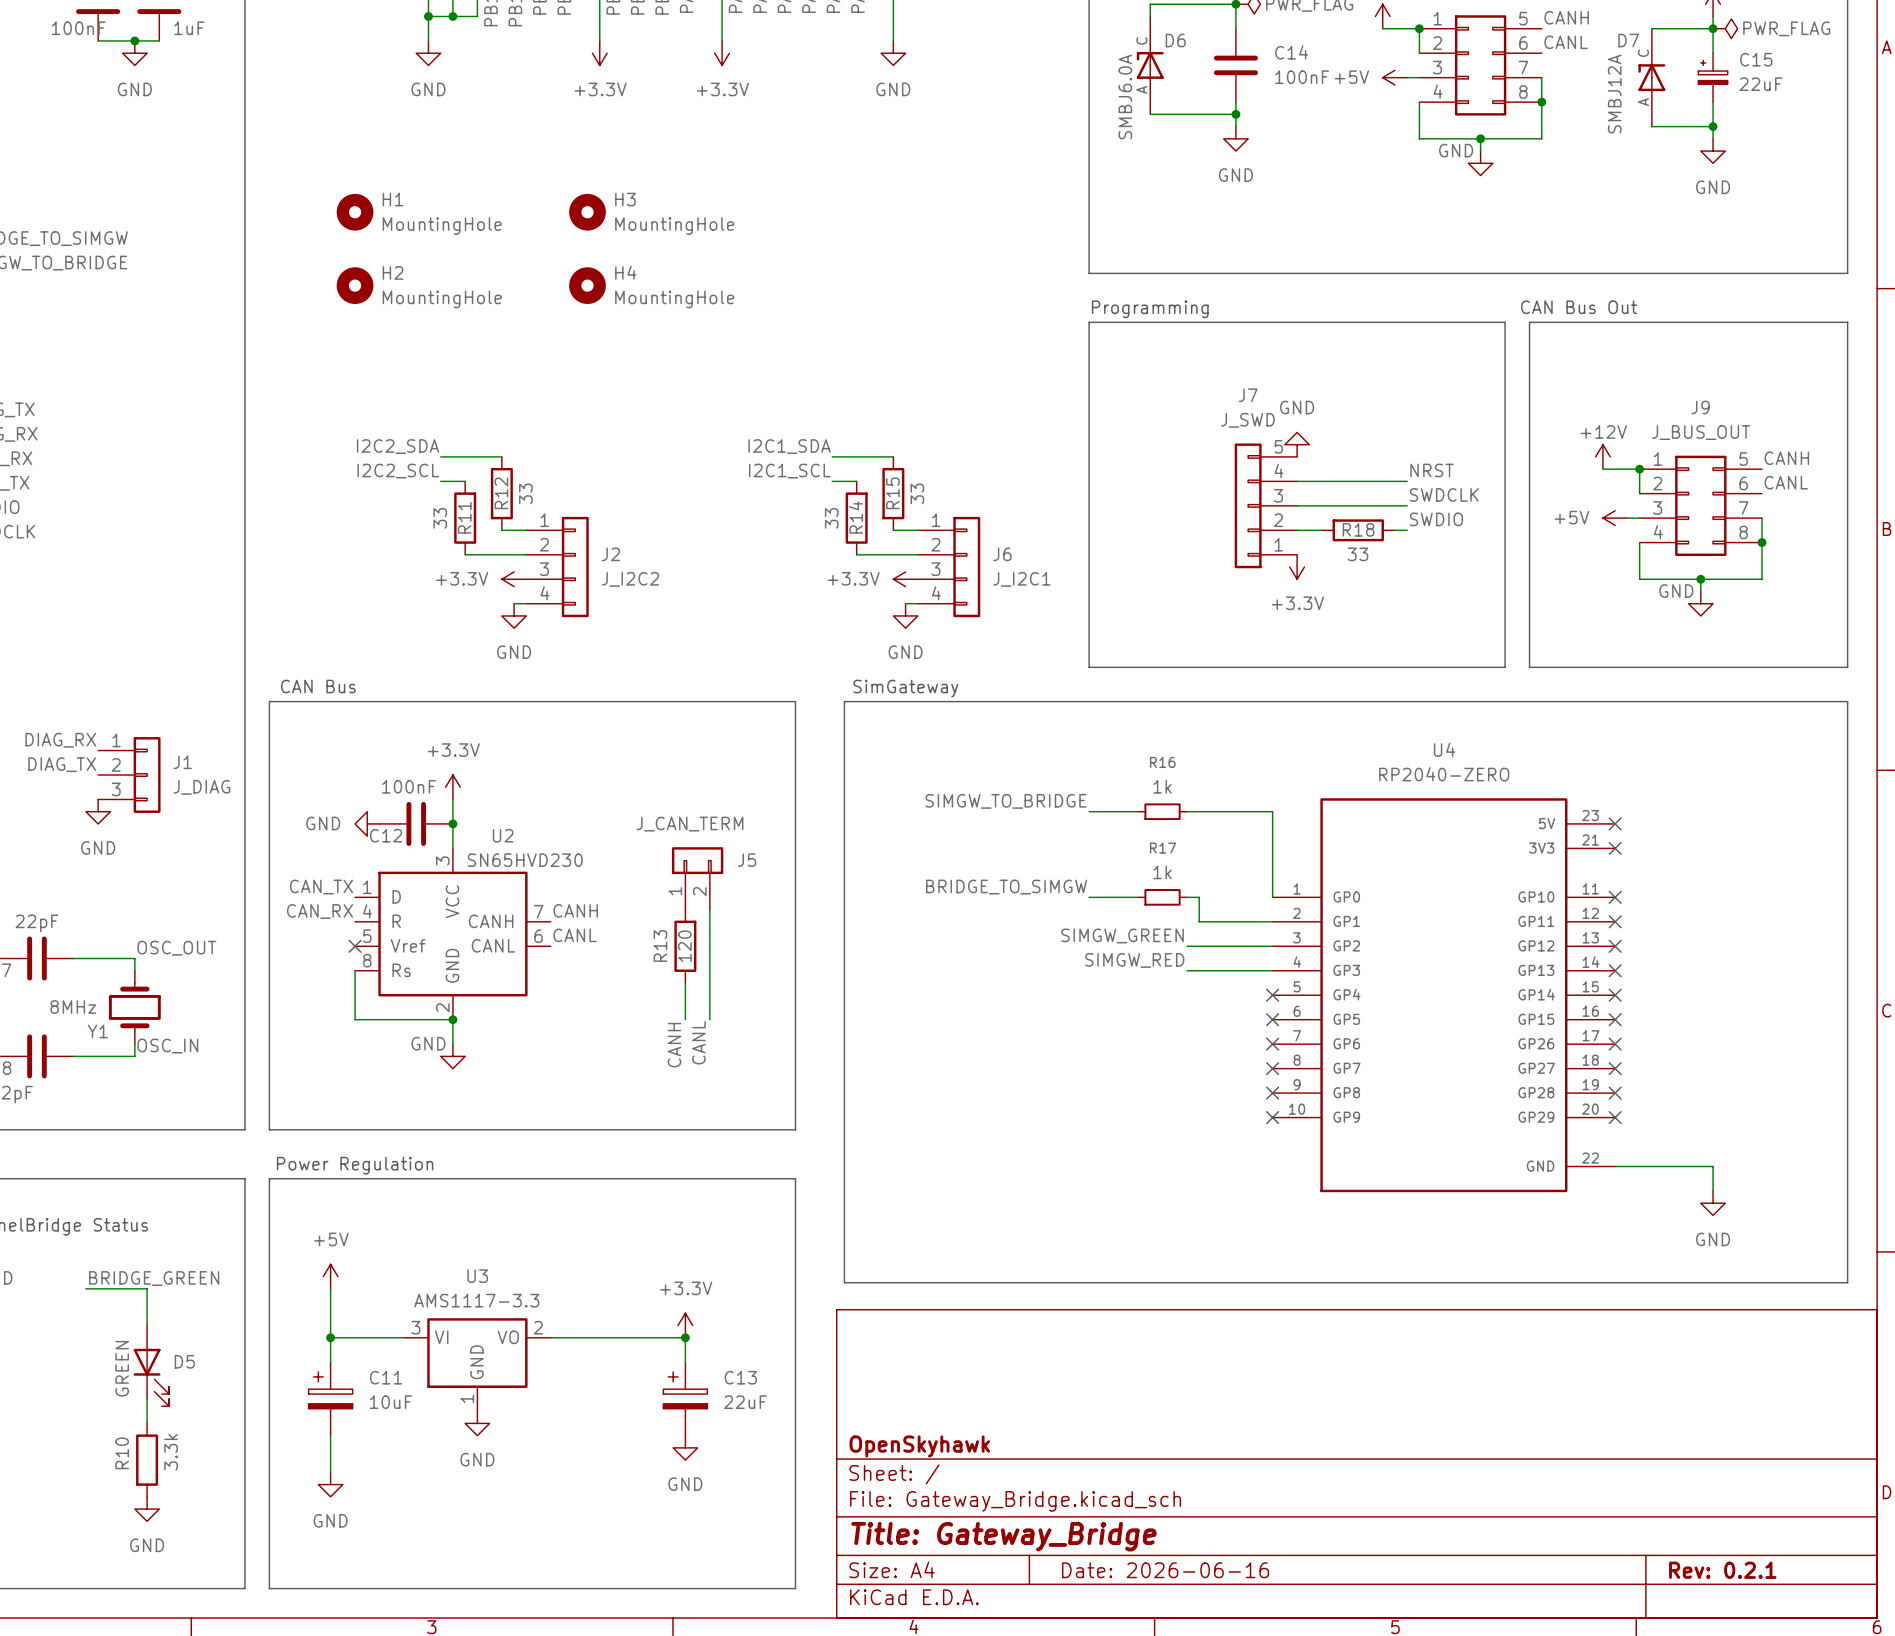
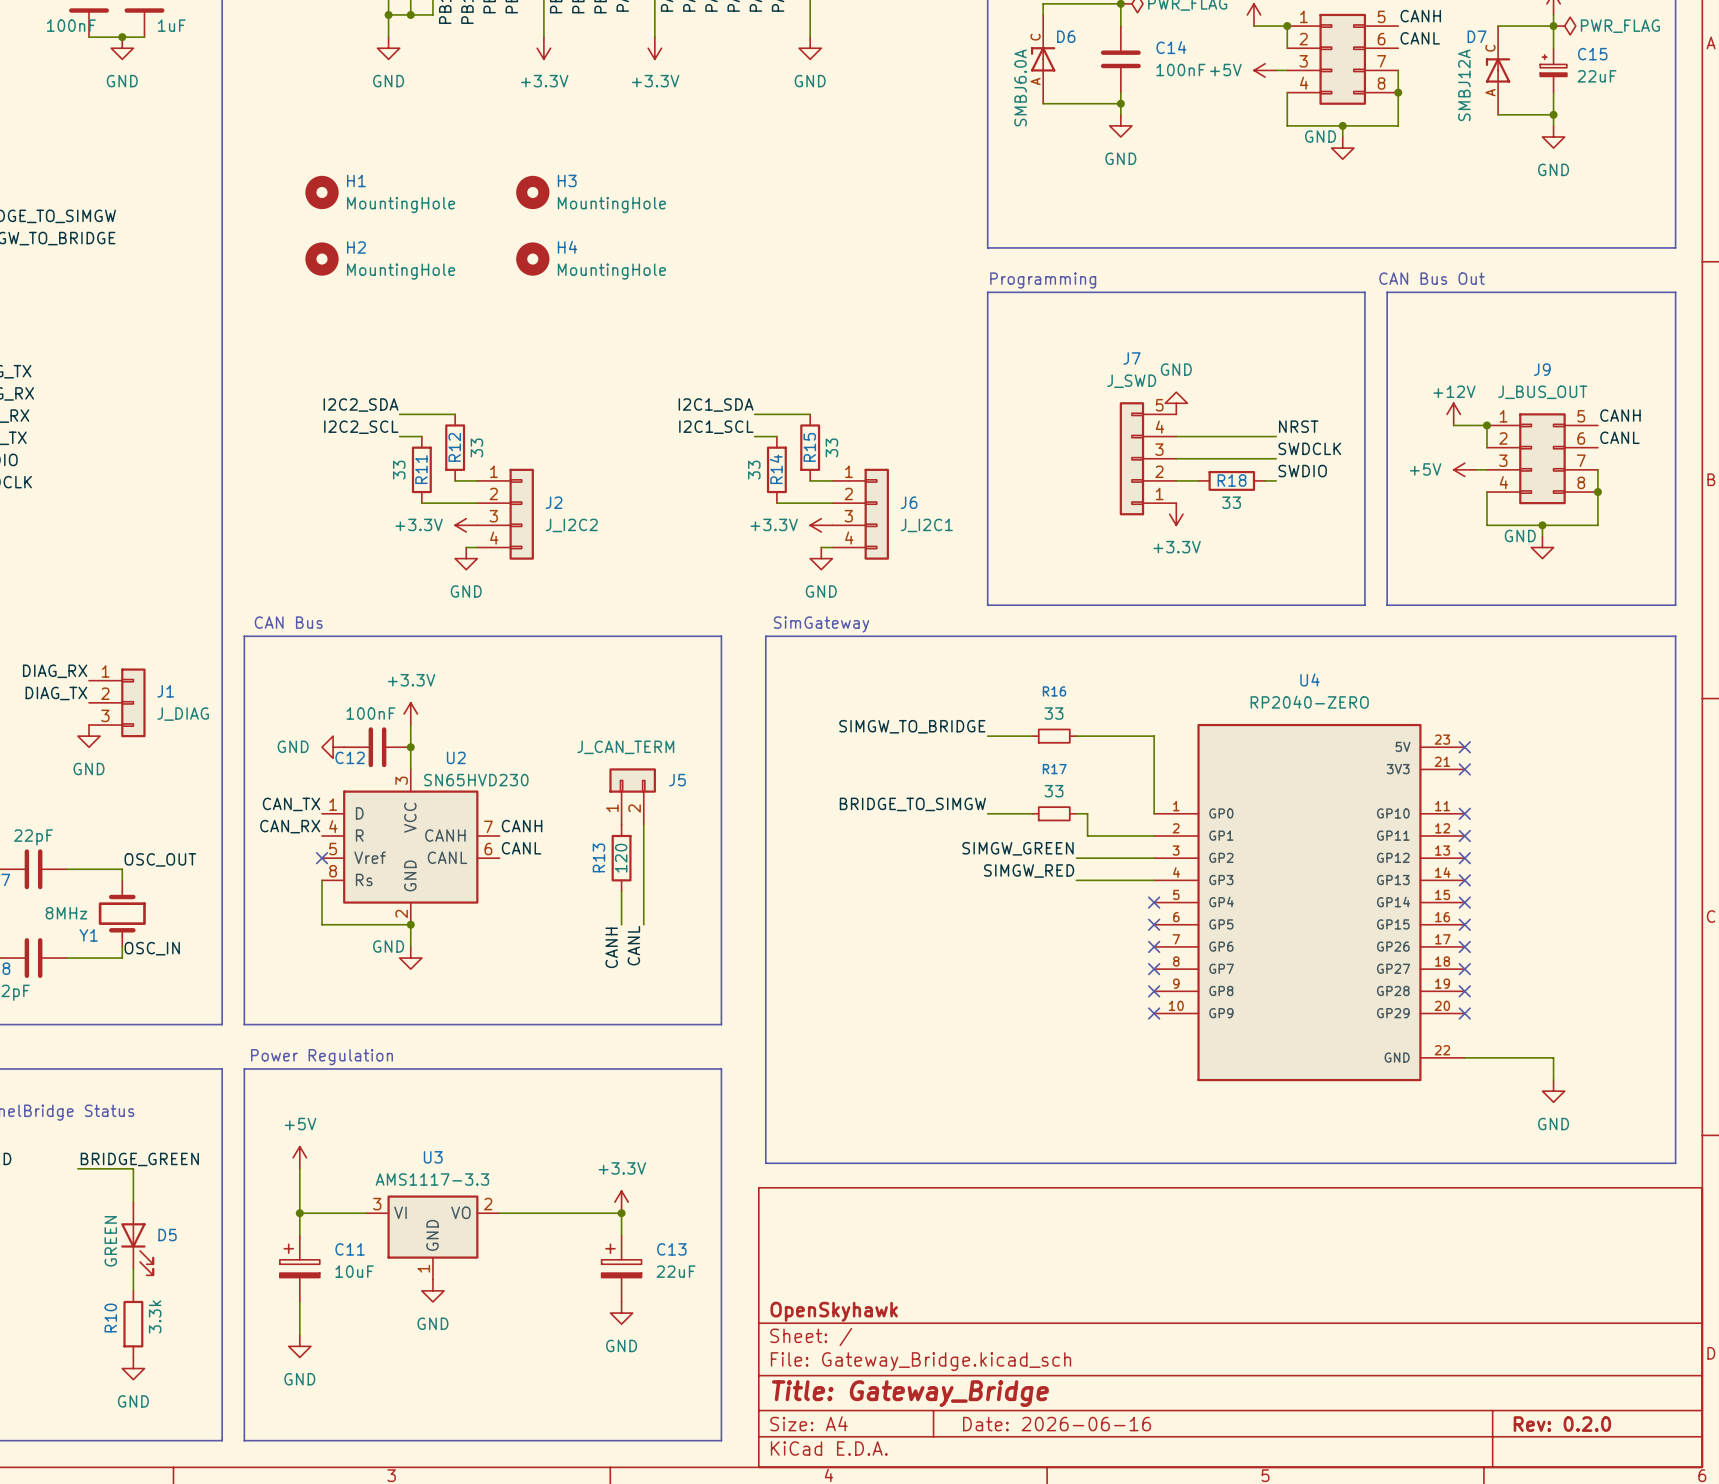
R16 value: 1k (1162, 786) -> 33 (1054, 713)
R17 value: 1k (1162, 872) -> 33 (1054, 791)
title block: Rev: 0.2.1 (1722, 1570) -> Rev: 0.2.0 (1562, 1424)

